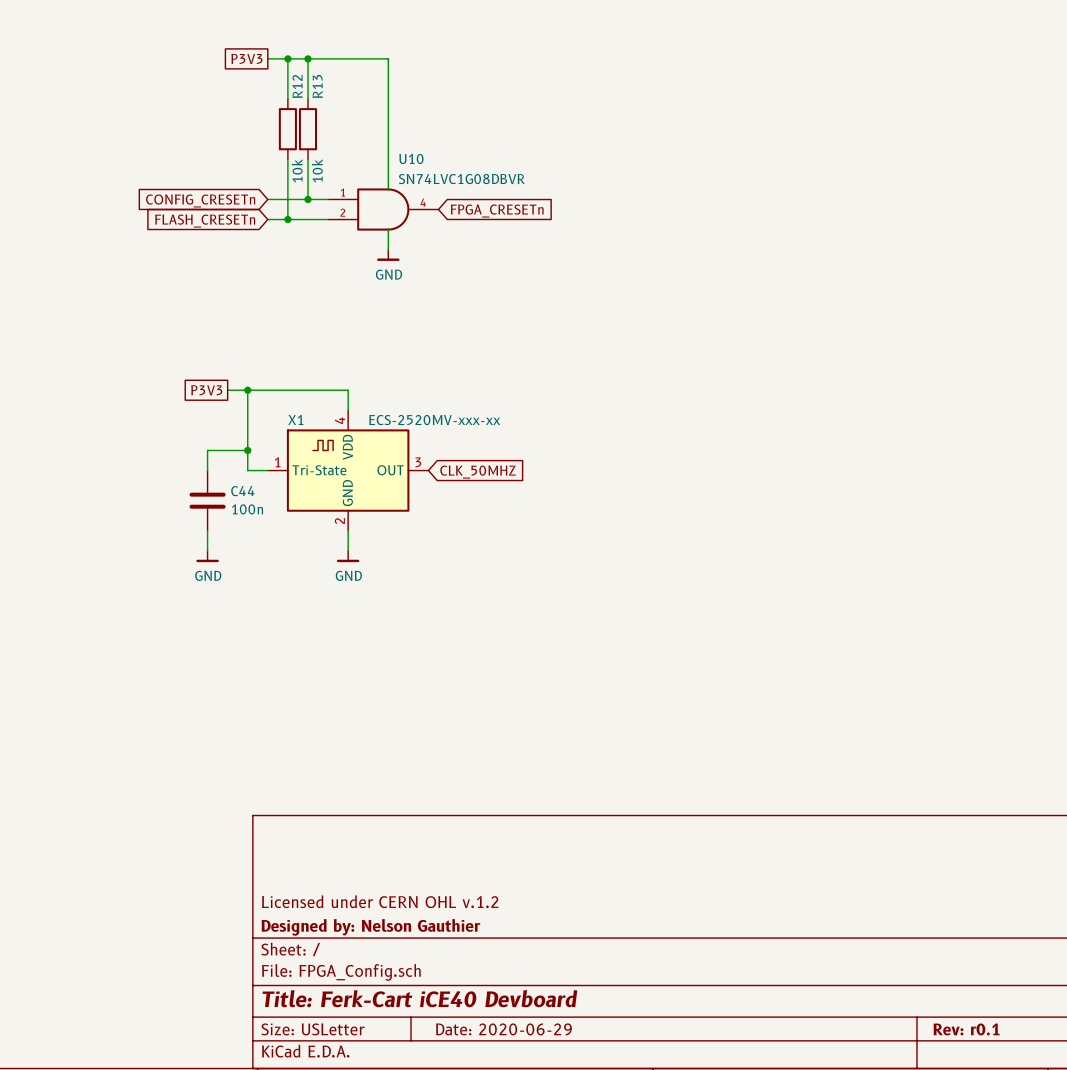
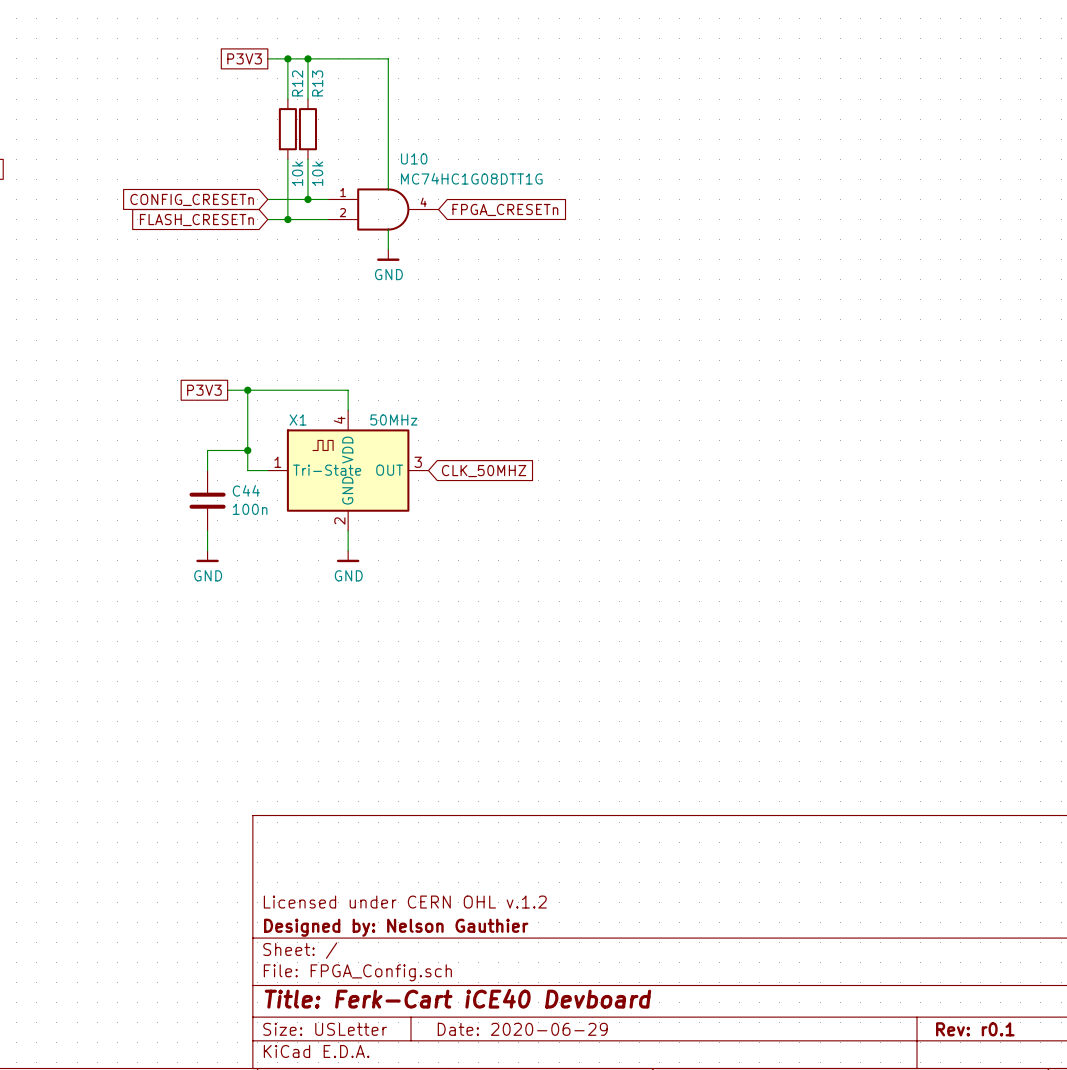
U10 value: SN74LVC1G08DBVR (461, 179) -> MC74HC1G08DTT1G (471, 178)
X1 value: ECS-2520MV-xxx-xx (434, 420) -> 50MHz (393, 419)

